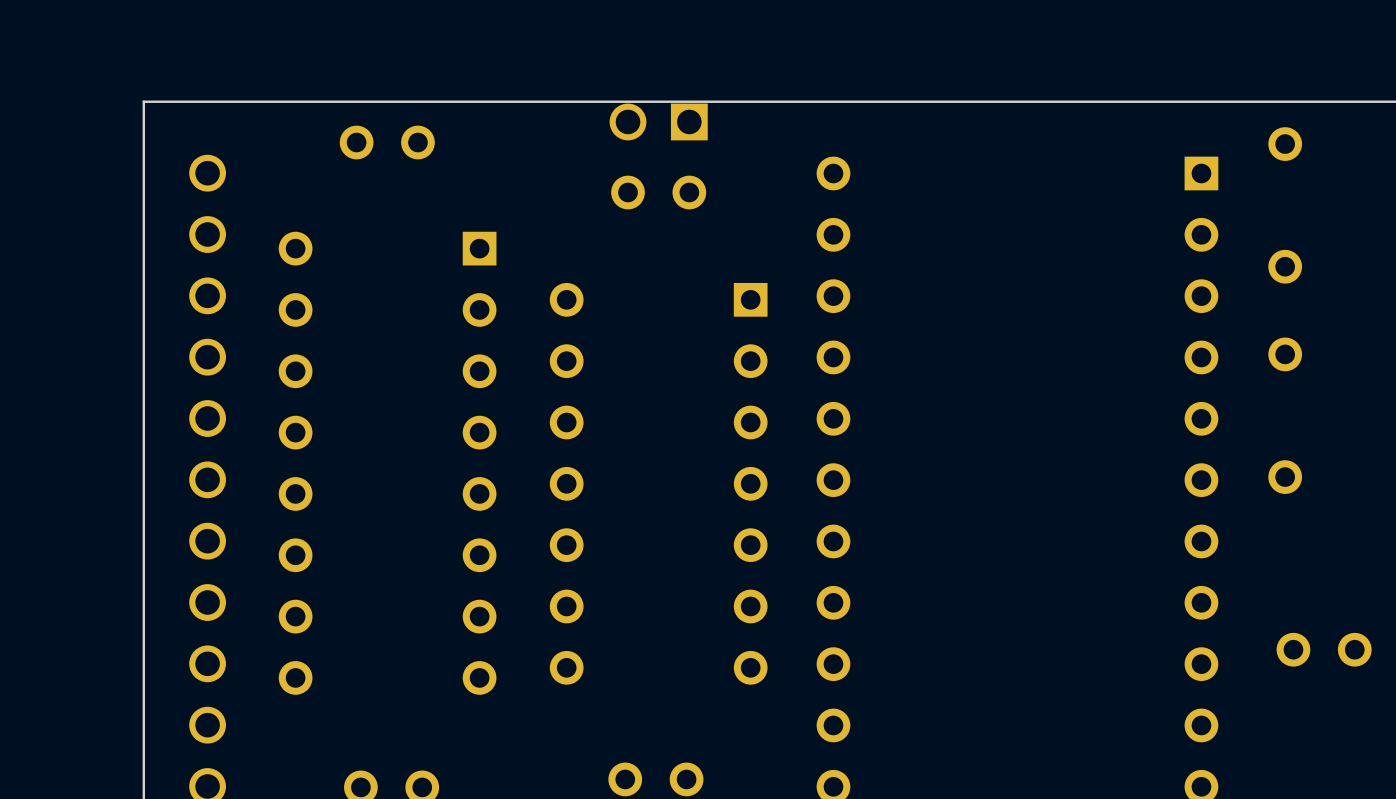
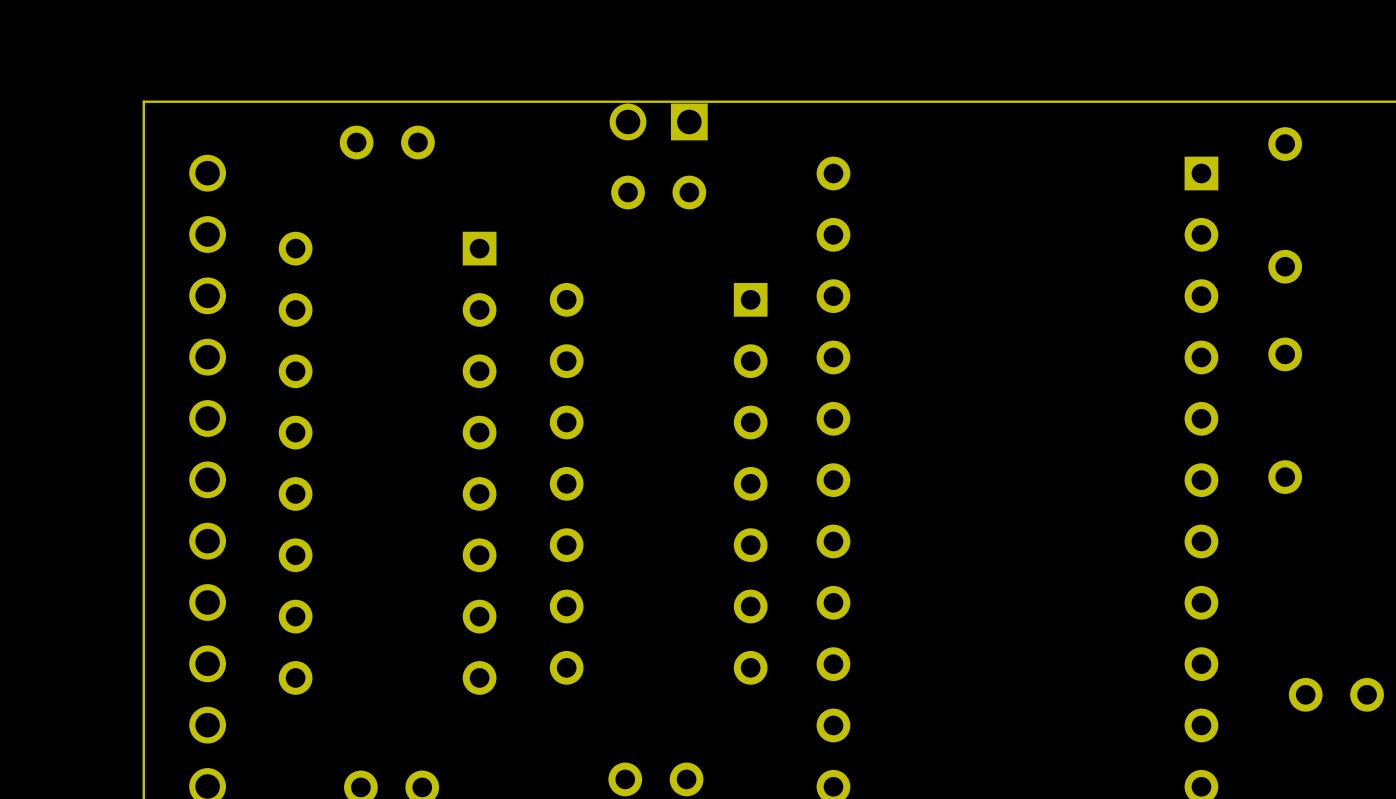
part position: (1324, 649) -> (1336, 694)

